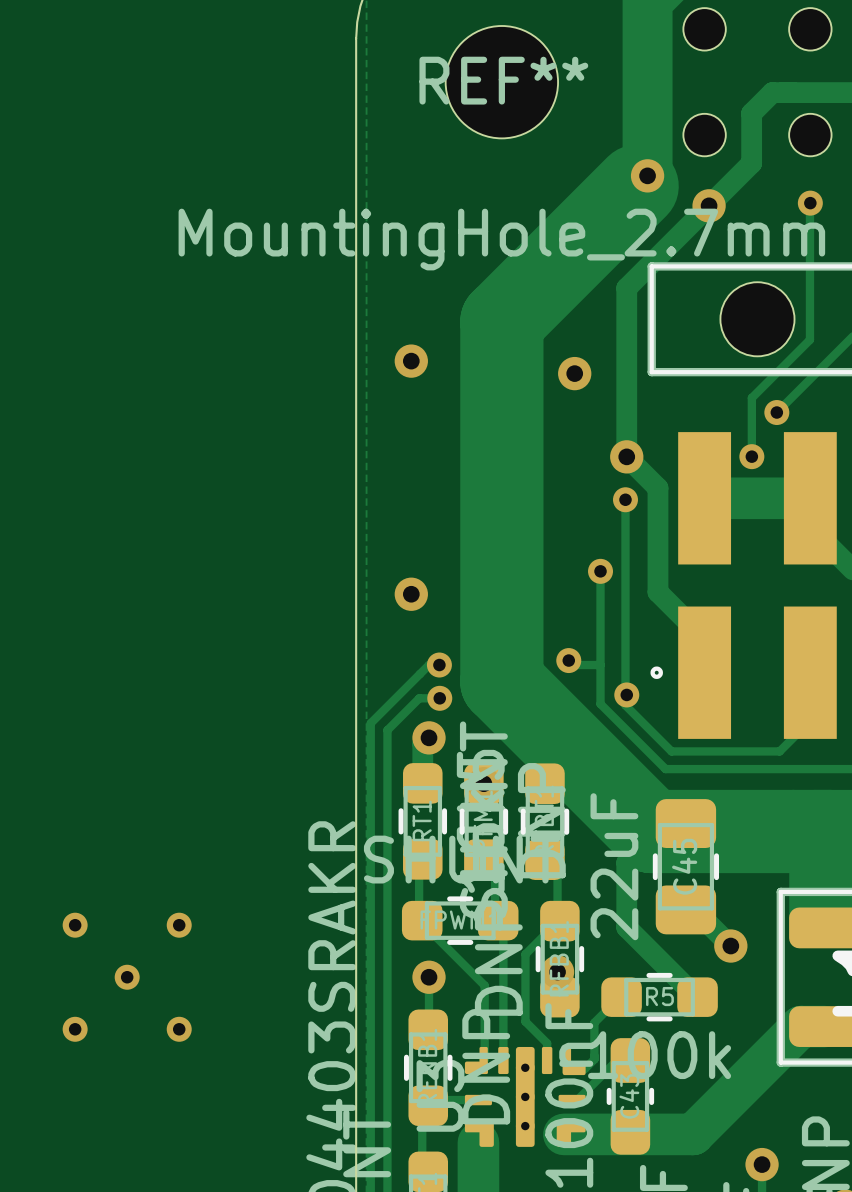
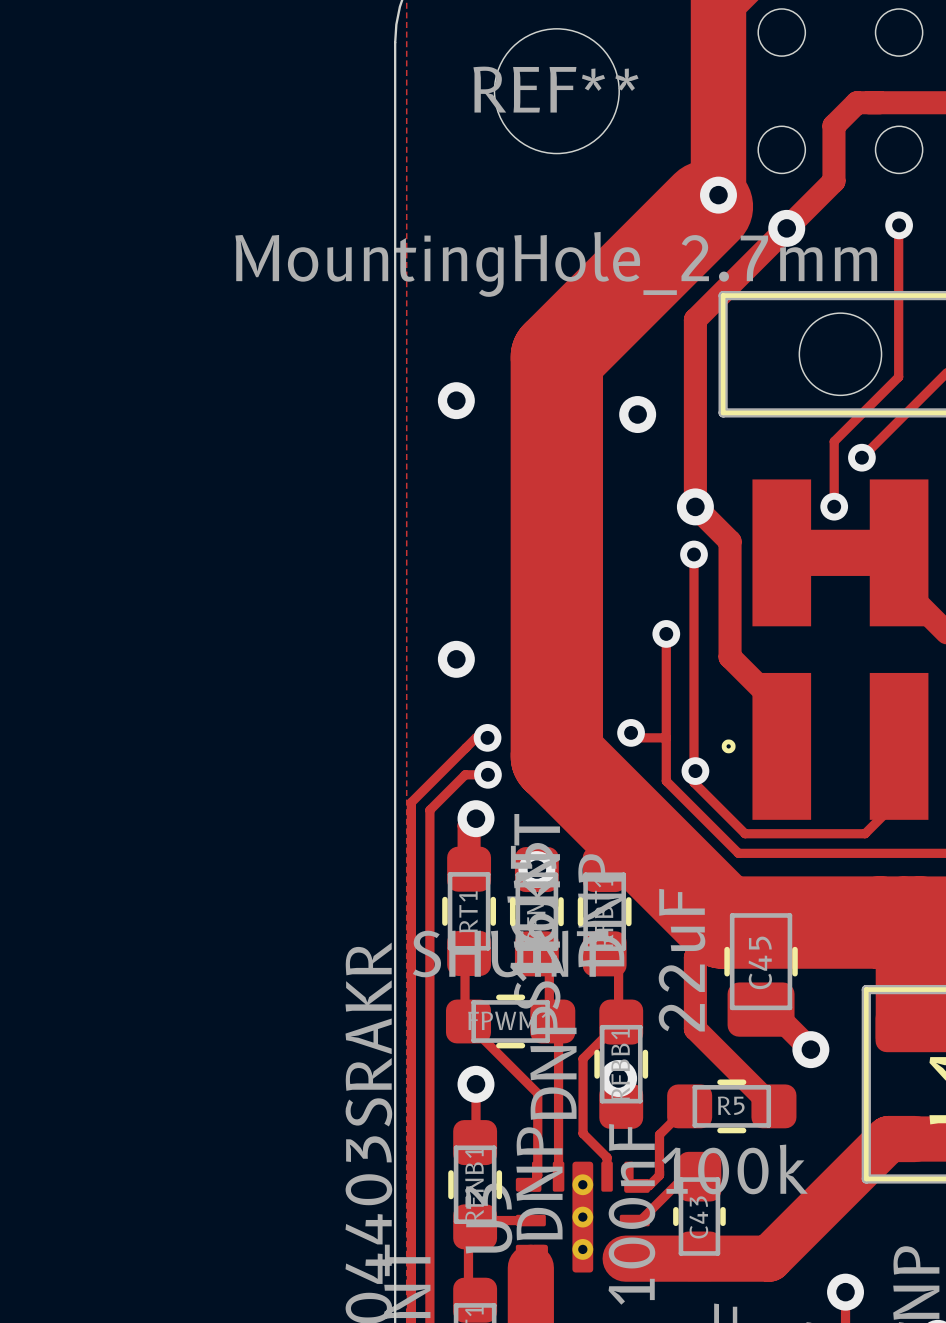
via: (75, 925) -> none
via: (179, 925) -> none
via: (127, 977) -> none
via: (75, 1029) -> none
via: (179, 1029) -> none

